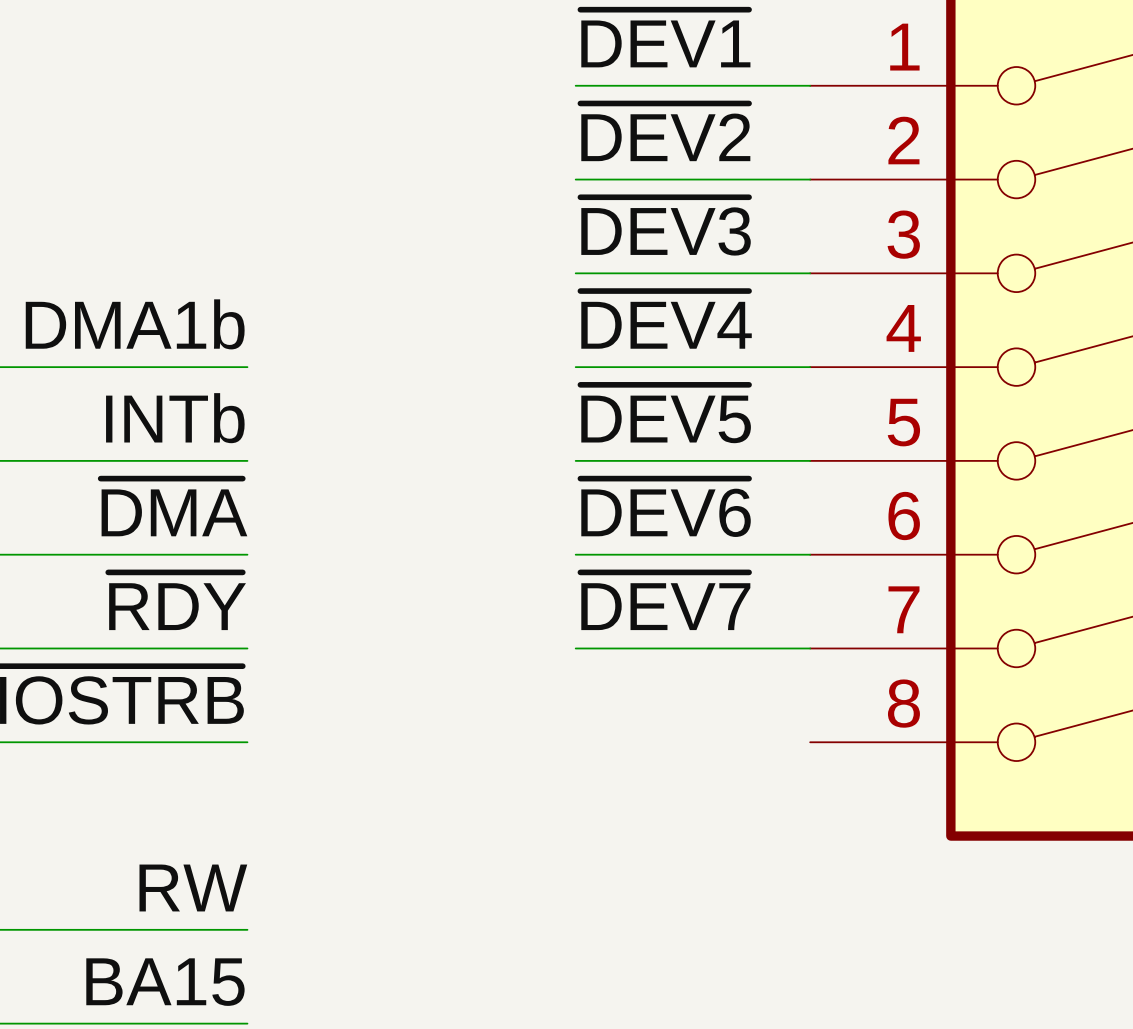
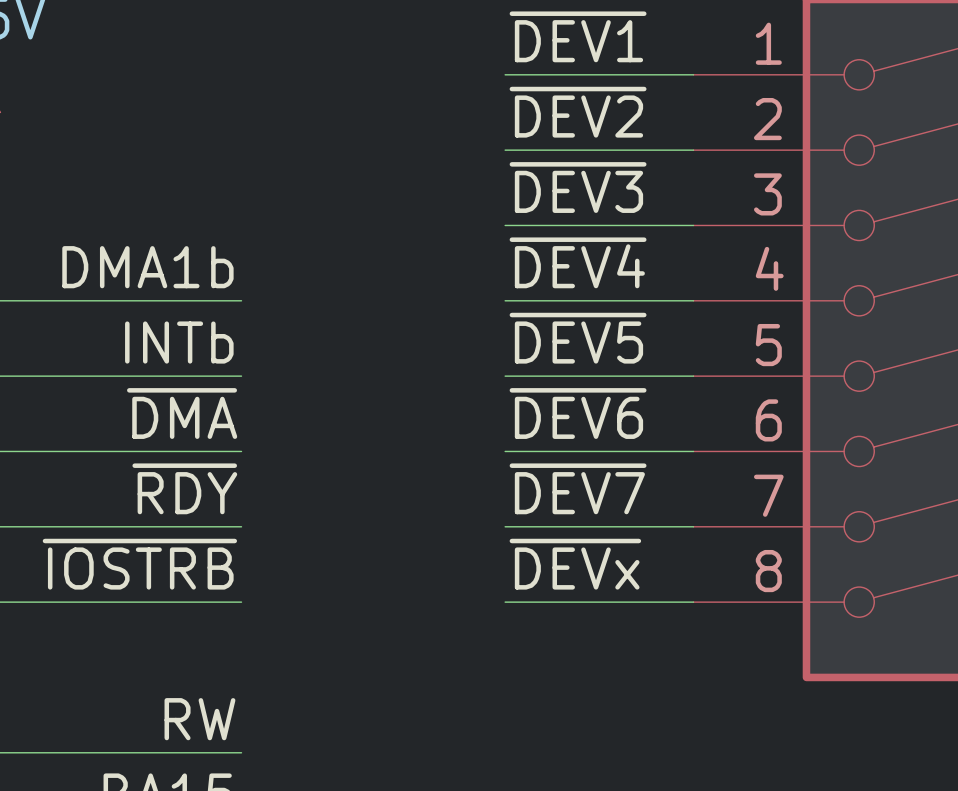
label: none -> ~{DEVx} (575, 564)
wire: none -> (505, 602) (693, 602)

